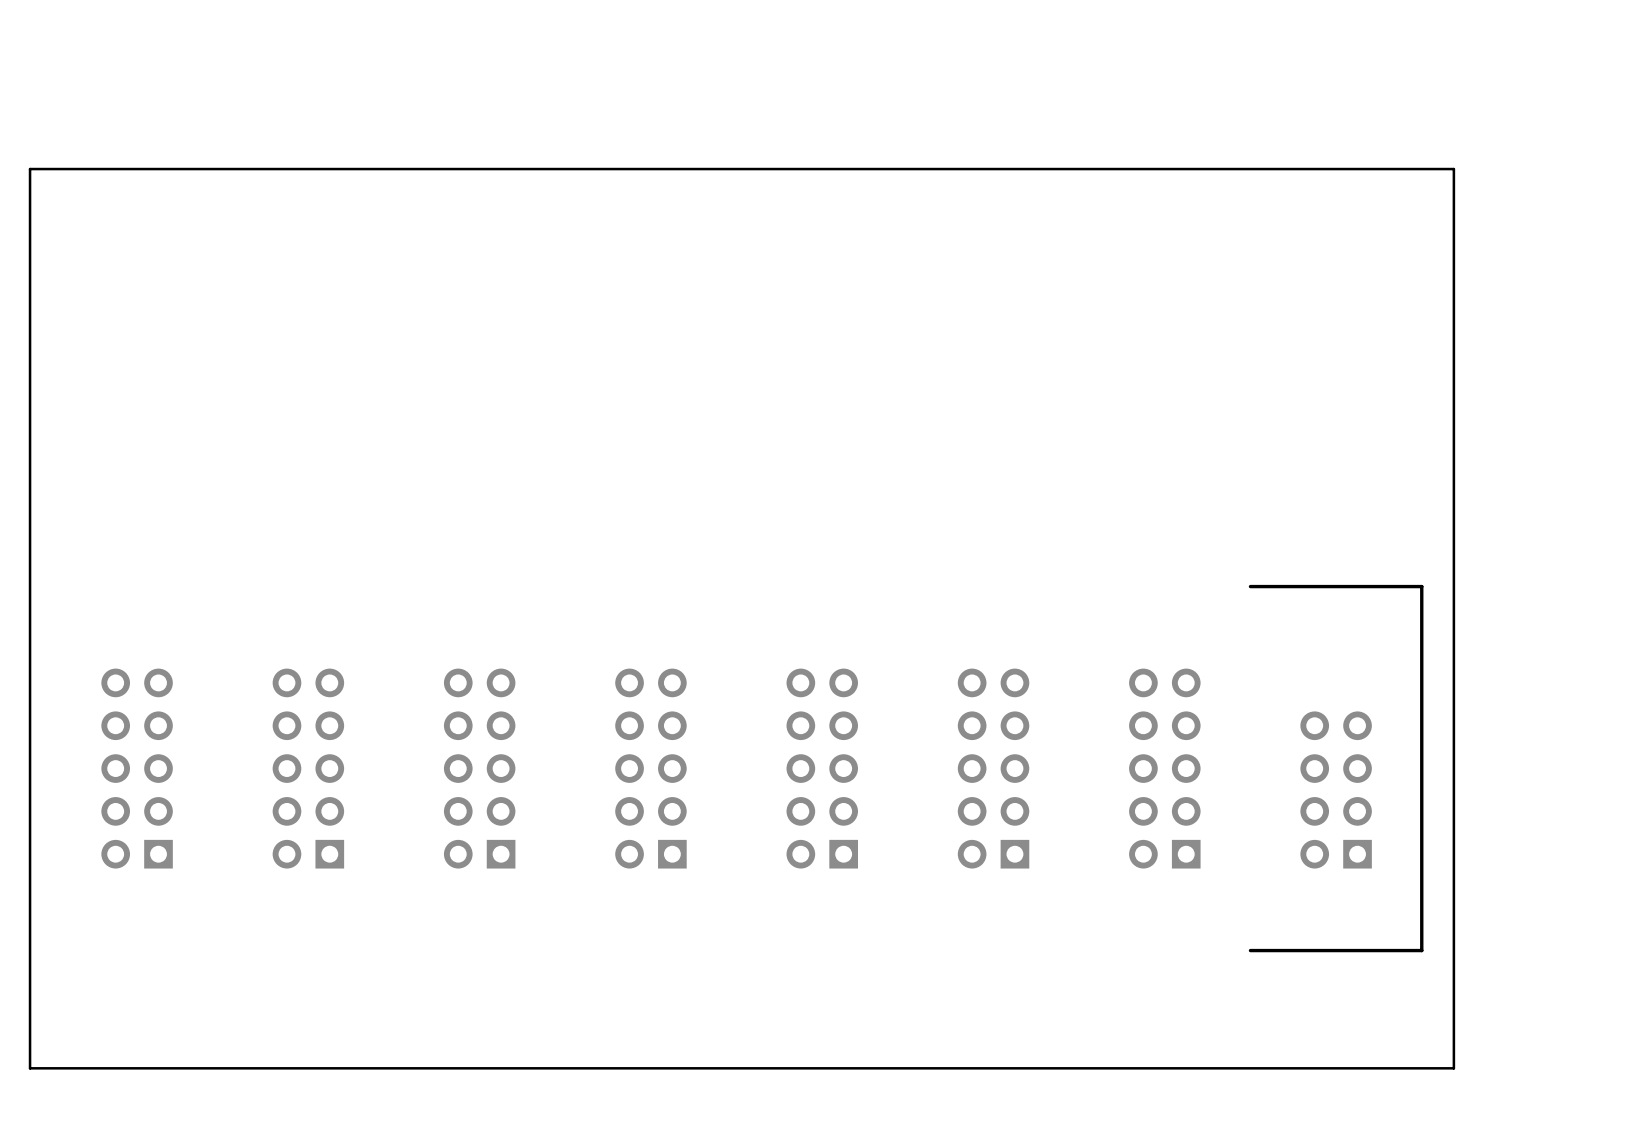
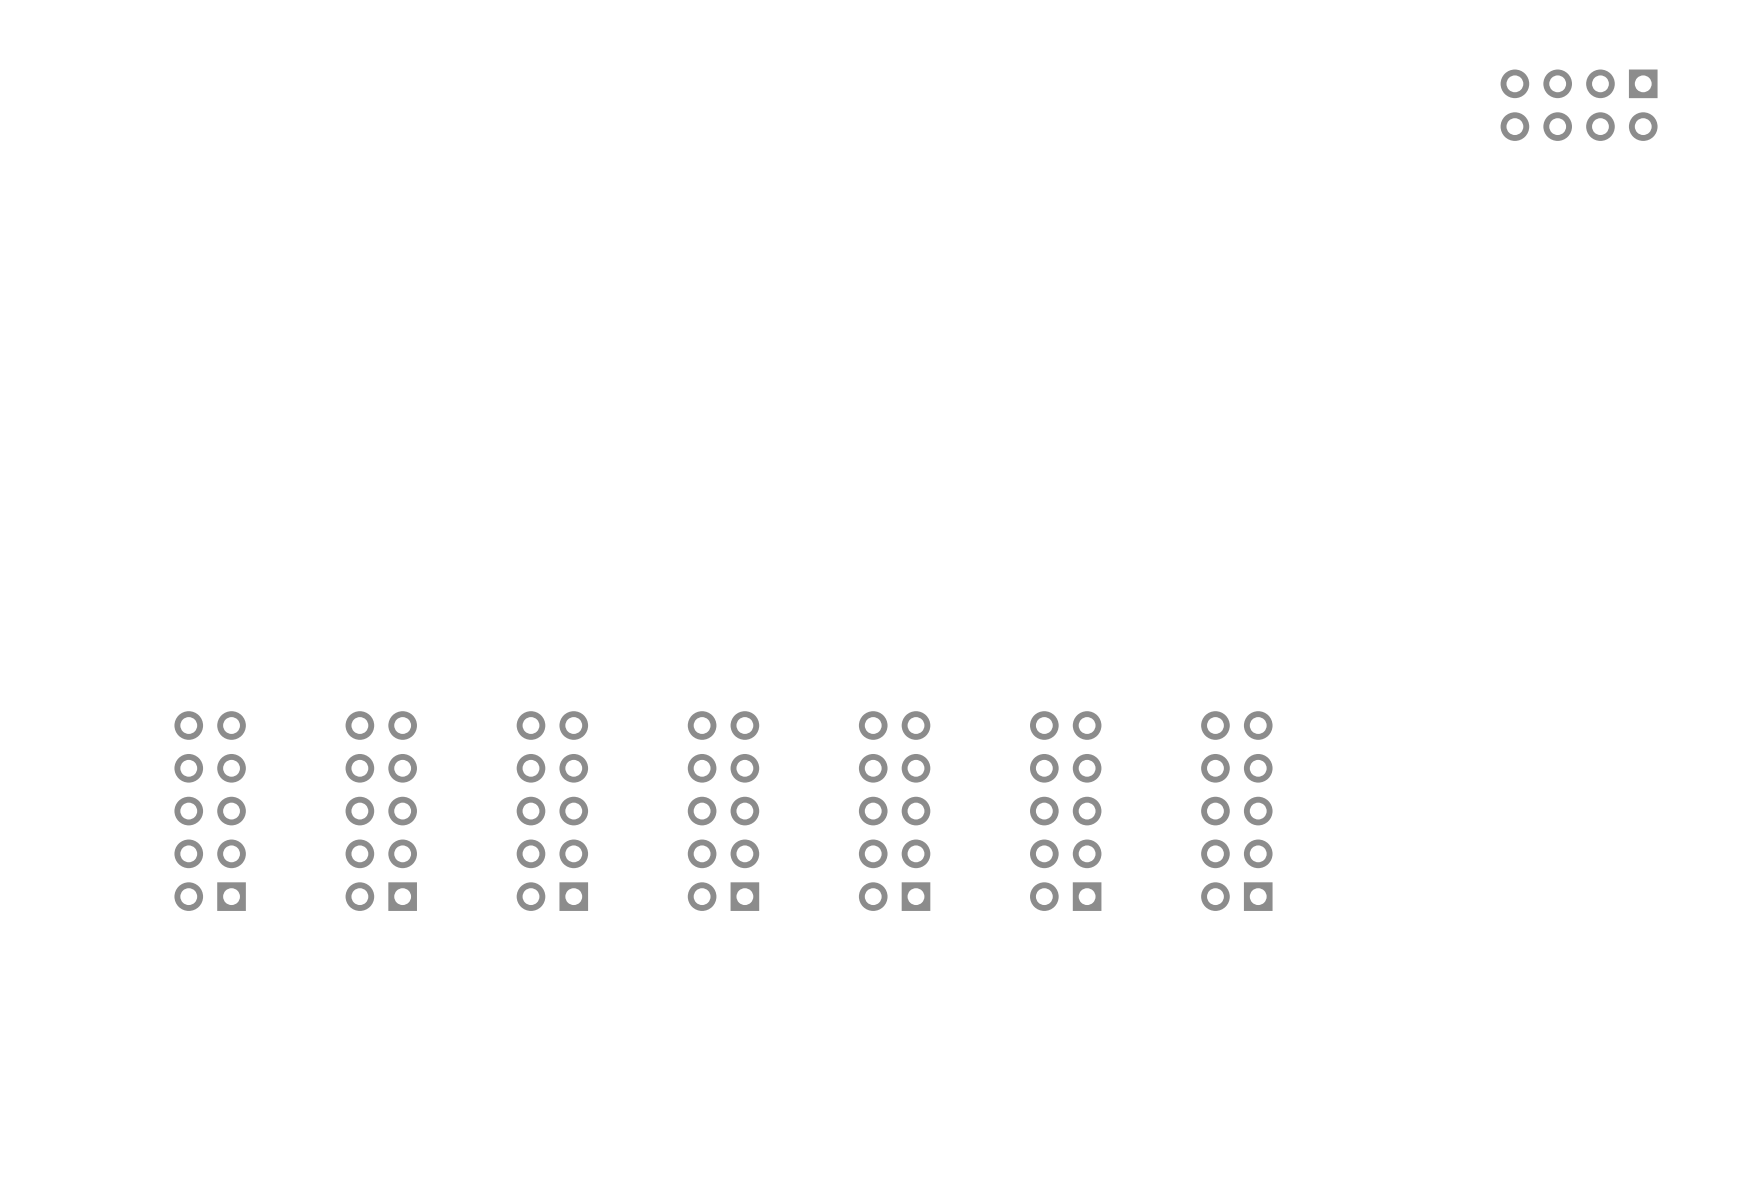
part: none -> (1579, 105)
board edge: (1453, 169) (1453, 1068) (30, 1068) (30, 169) (1453, 169) -> none
line: (1250, 586) (1421, 586) (1421, 950) (1250, 950) -> none
part: (1336, 789) -> none

